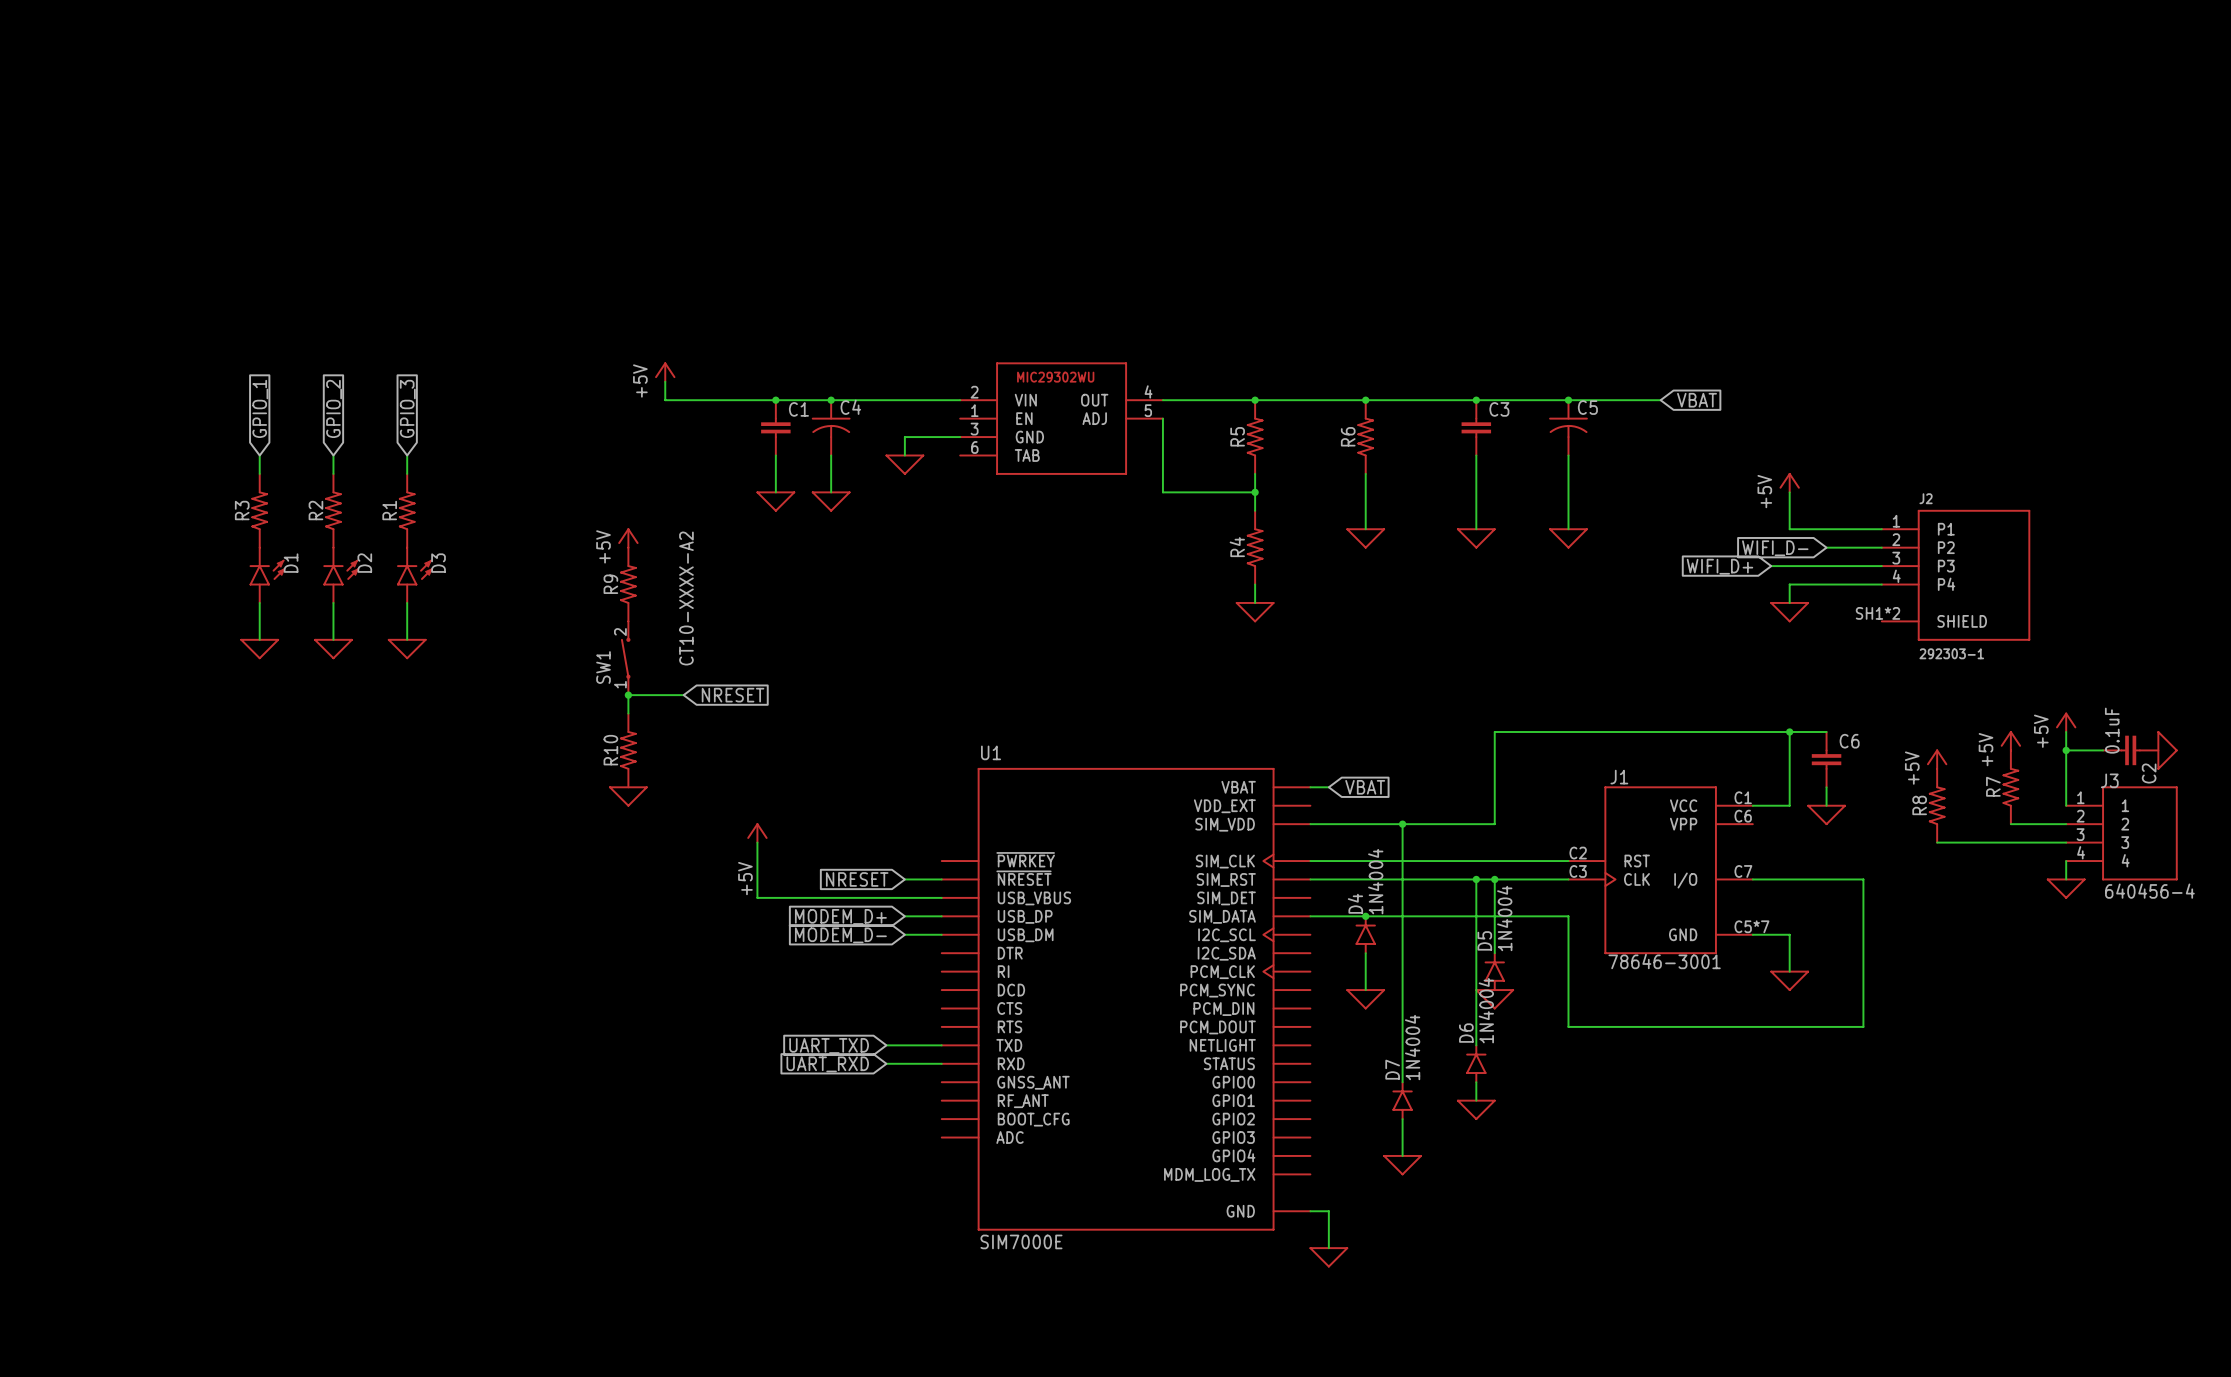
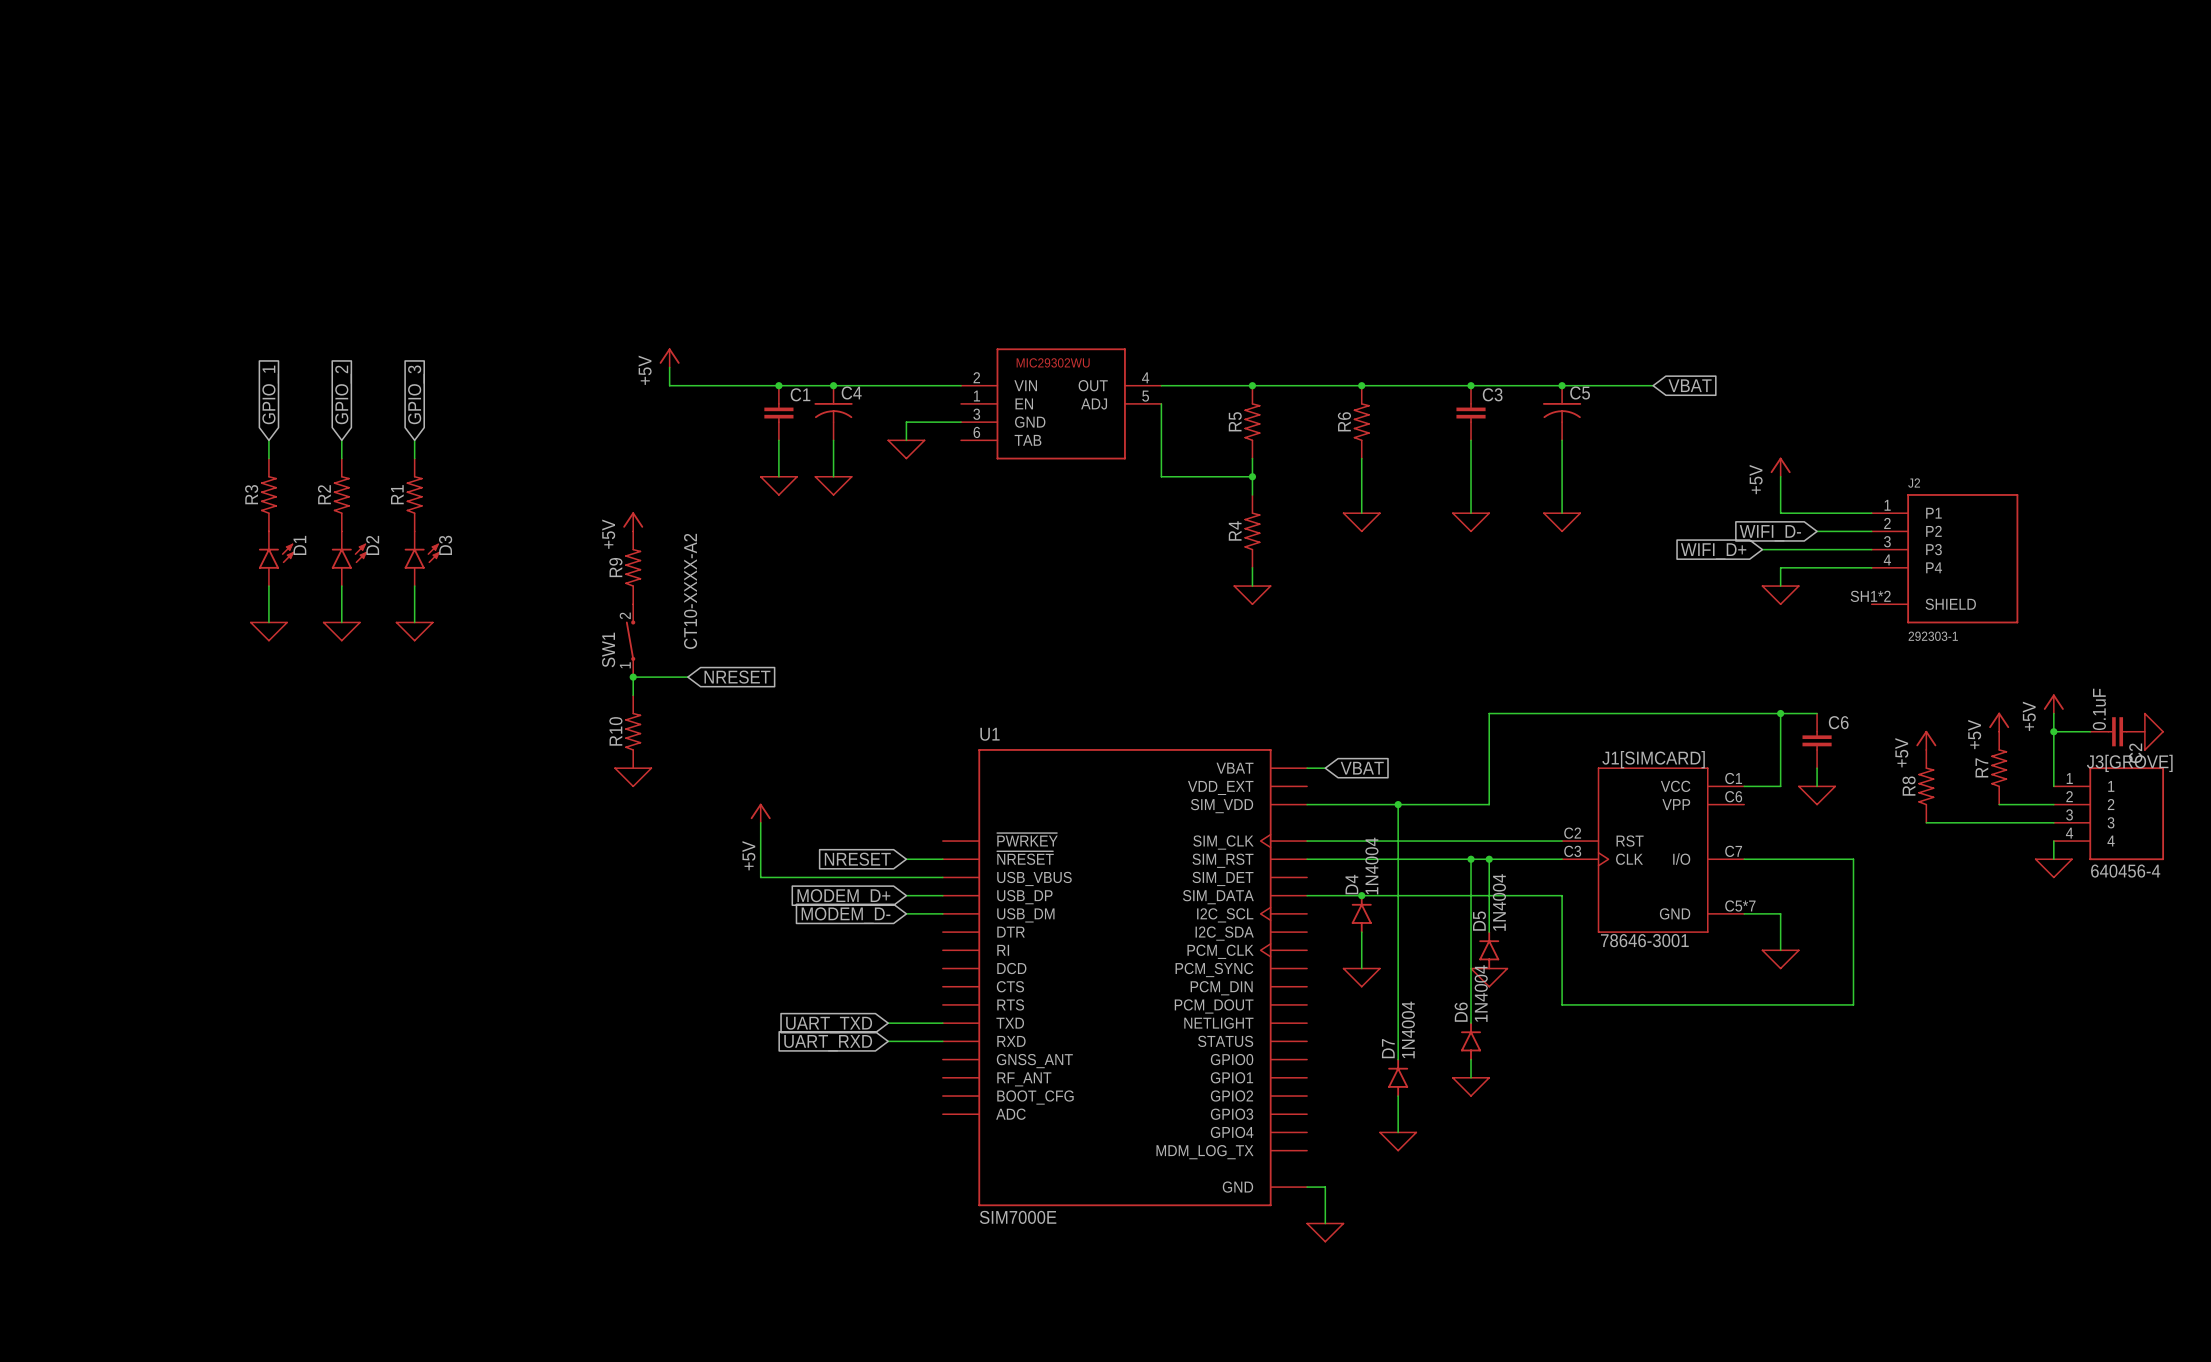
J1 name: J1 (1619, 777) -> J1[SIMCARD] (1653, 759)
J3 name: J3 (2109, 780) -> J3[GROVE] (2129, 763)

